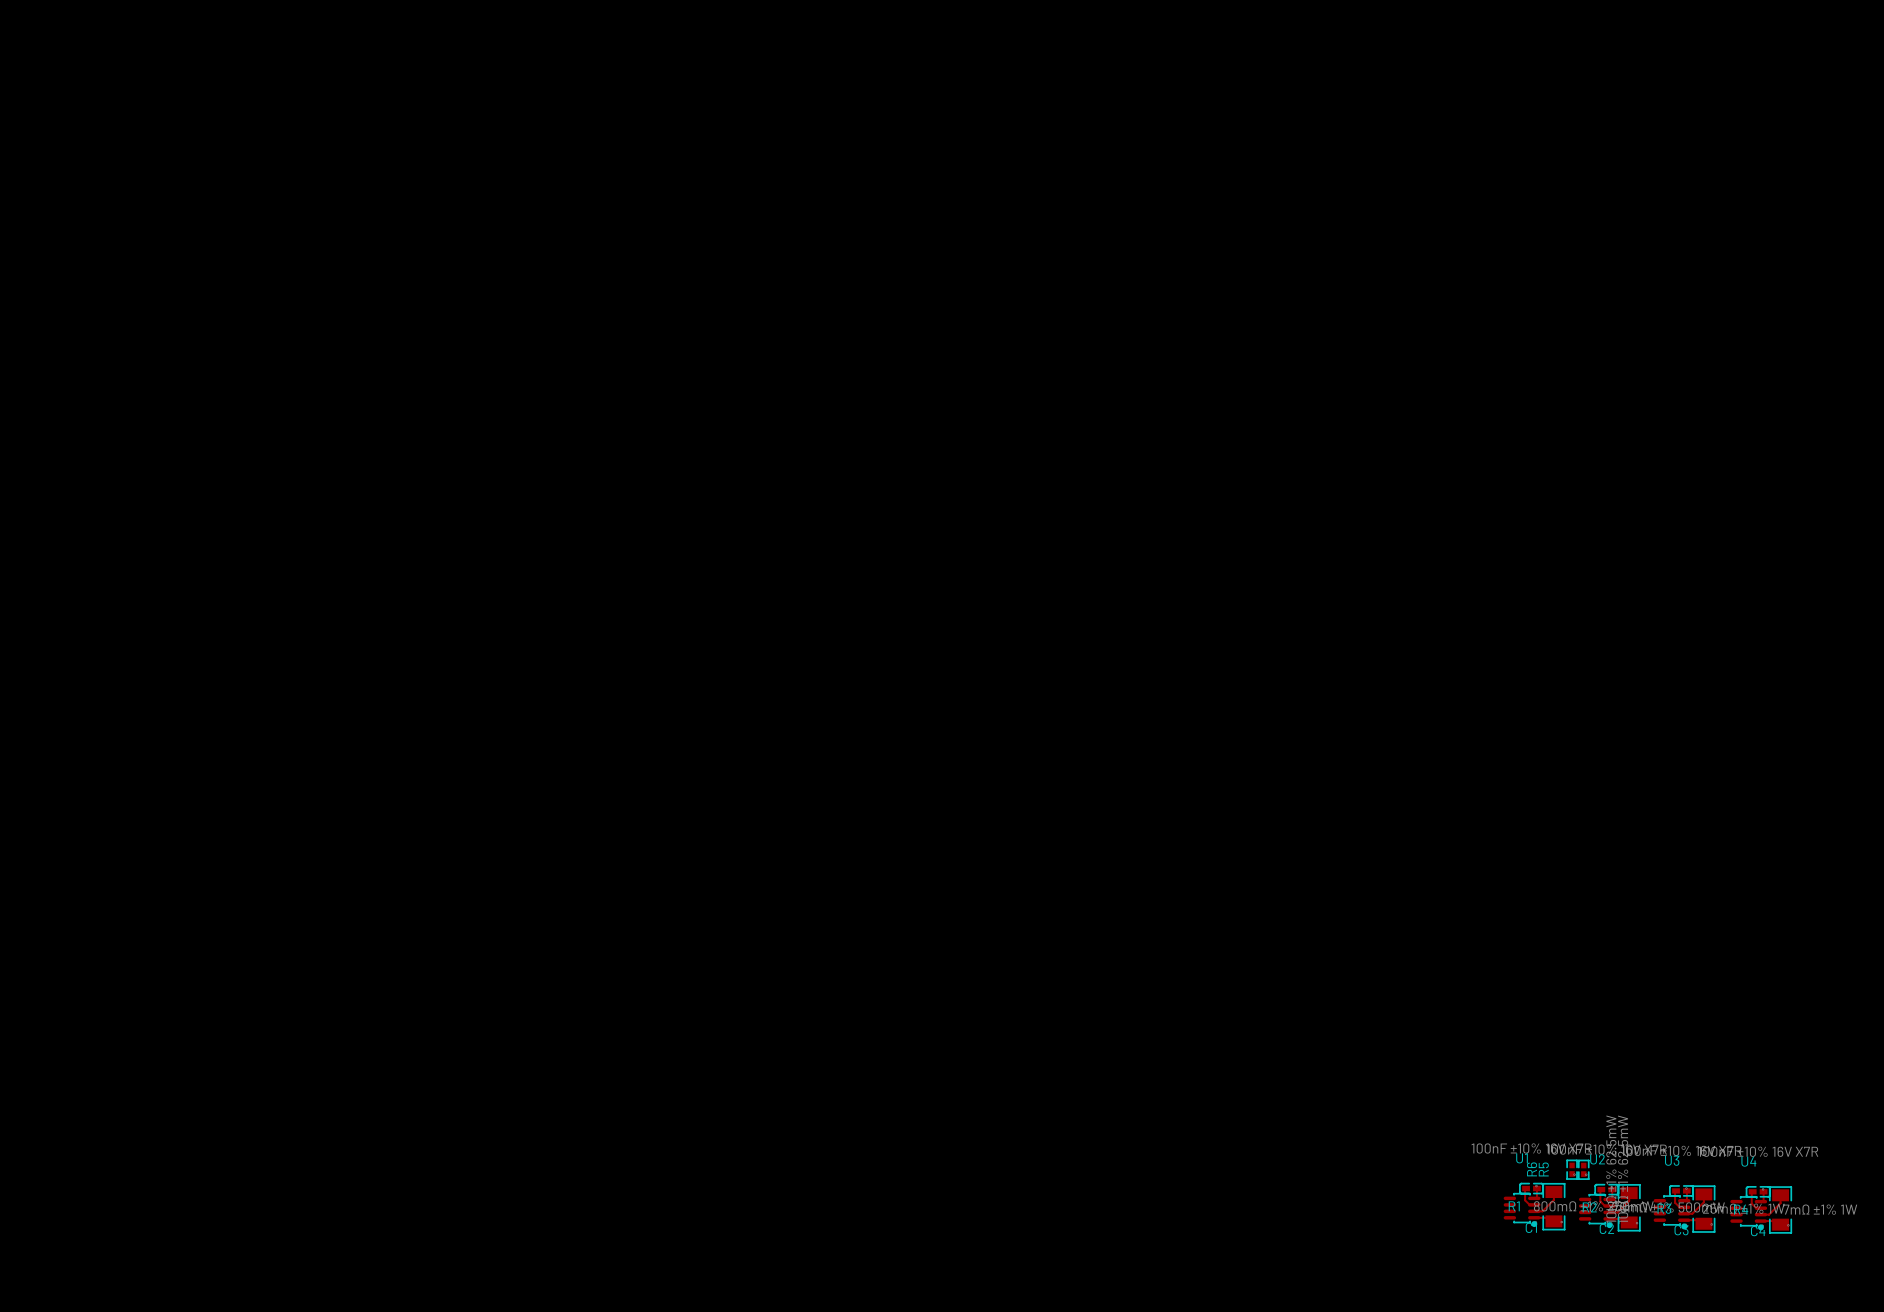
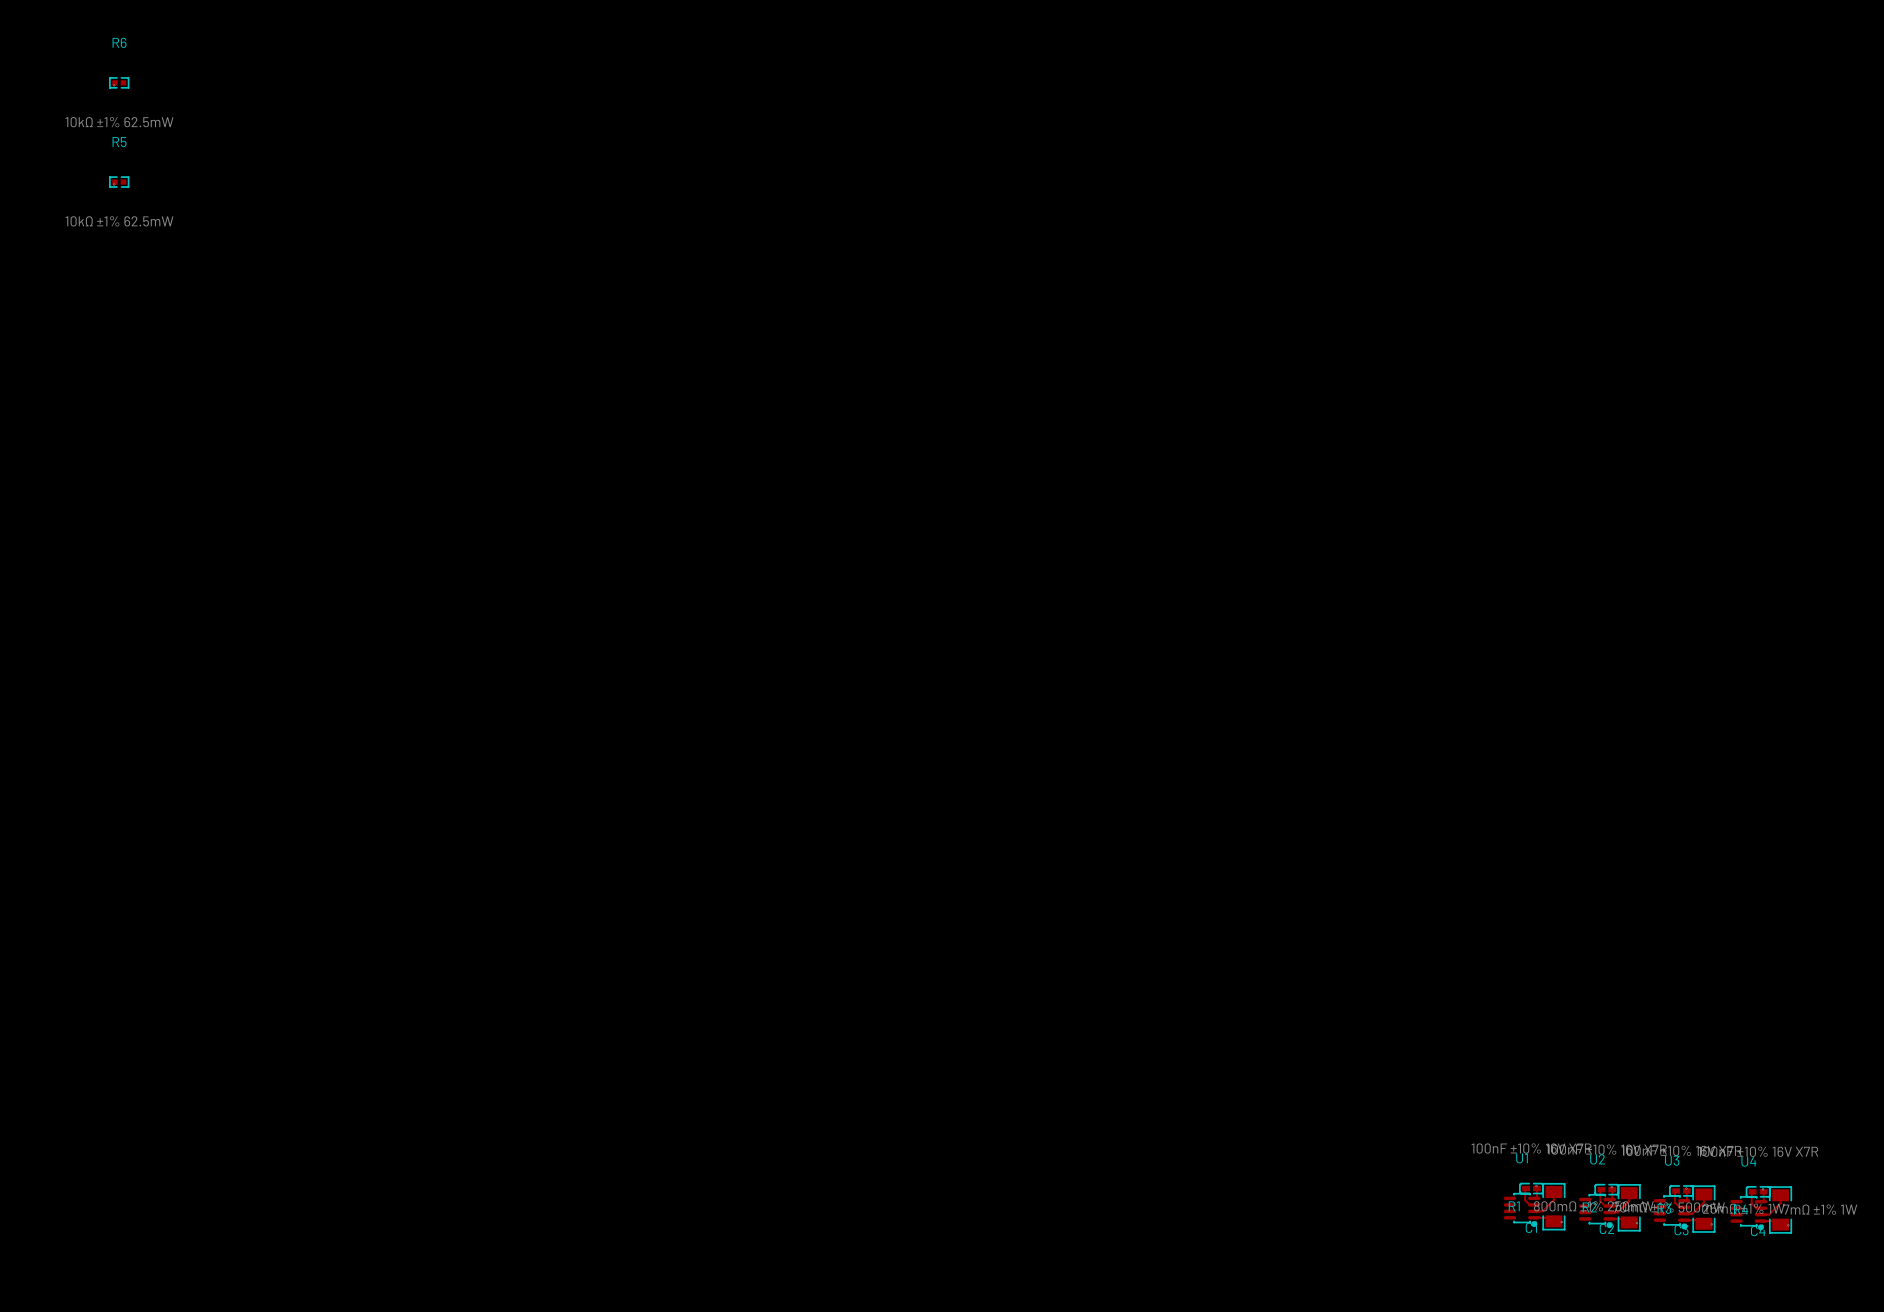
R6 rotation: 0° (1572, 1169) -> 90° clockwise (119, 82)
R6 position: (1572, 1169) -> (119, 82)
R5 rotation: 0° (1583, 1169) -> 90° clockwise (119, 182)
R5 position: (1583, 1169) -> (119, 182)

